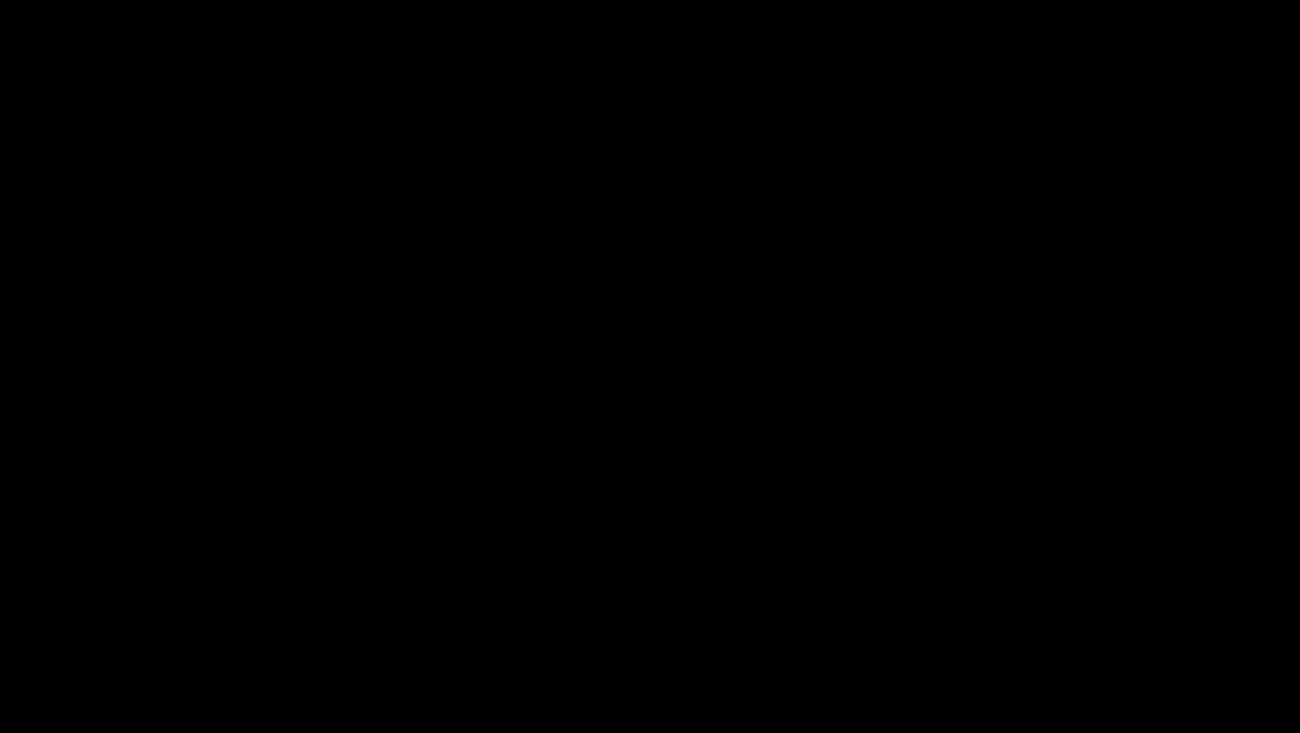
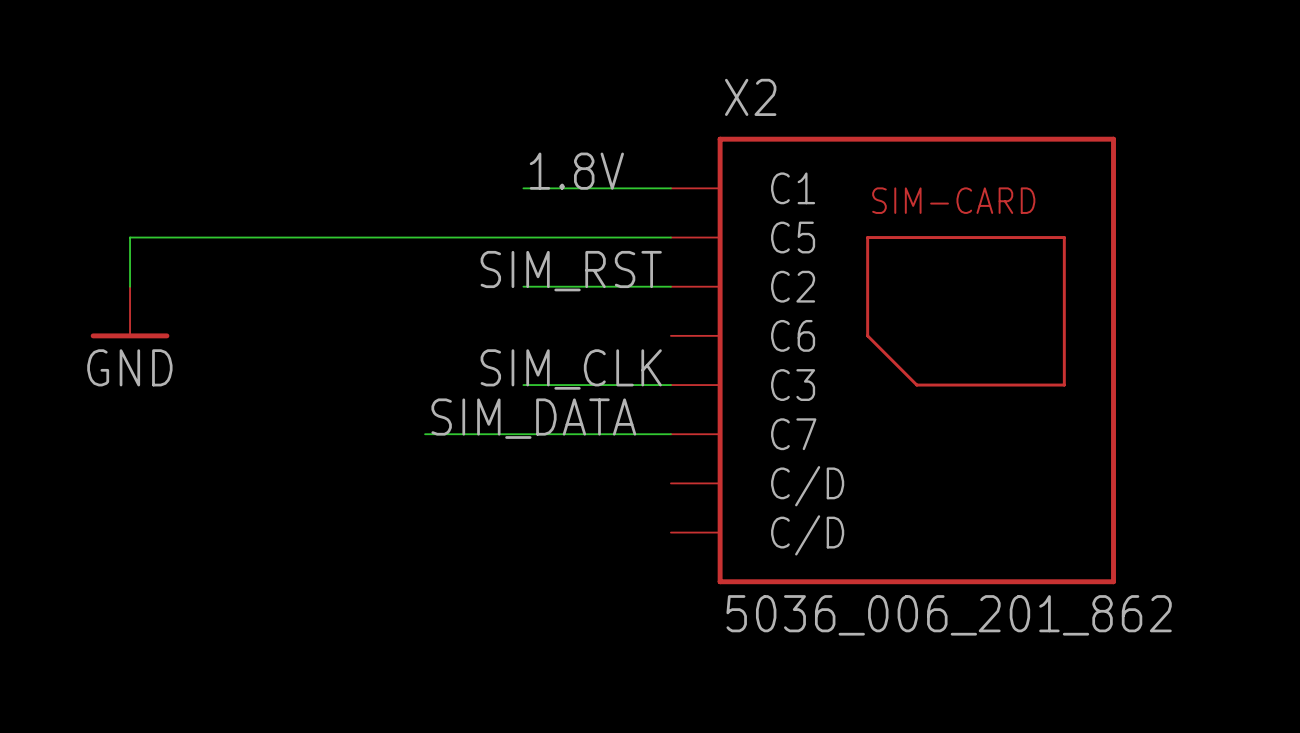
label: none -> 1.8V (576, 171)
wire: none -> (523, 188) (670, 188)
wire: none -> (670, 237) (130, 237) (130, 286)
label: none -> SIM_RST (571, 271)
wire: none -> (523, 286) (670, 286)
power symbol: none -> GND (130, 312)
X2: none -> 5036_006_201_862 (893, 360)
label: none -> SIM_CLK (571, 369)
wire: none -> (523, 385) (670, 385)
label: none -> SIM_DATA (533, 418)
wire: none -> (425, 434) (670, 434)

